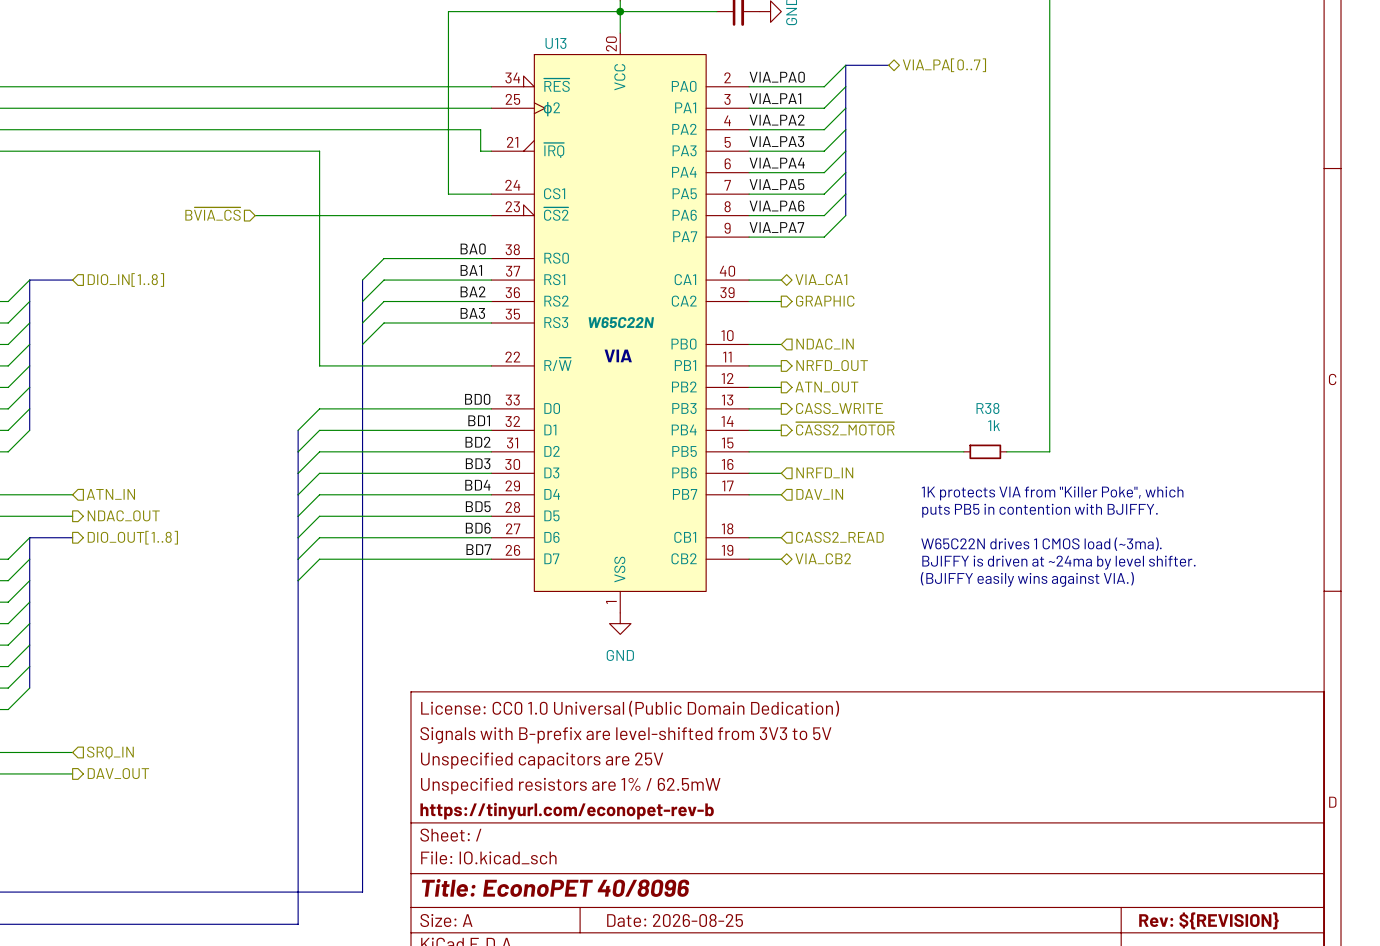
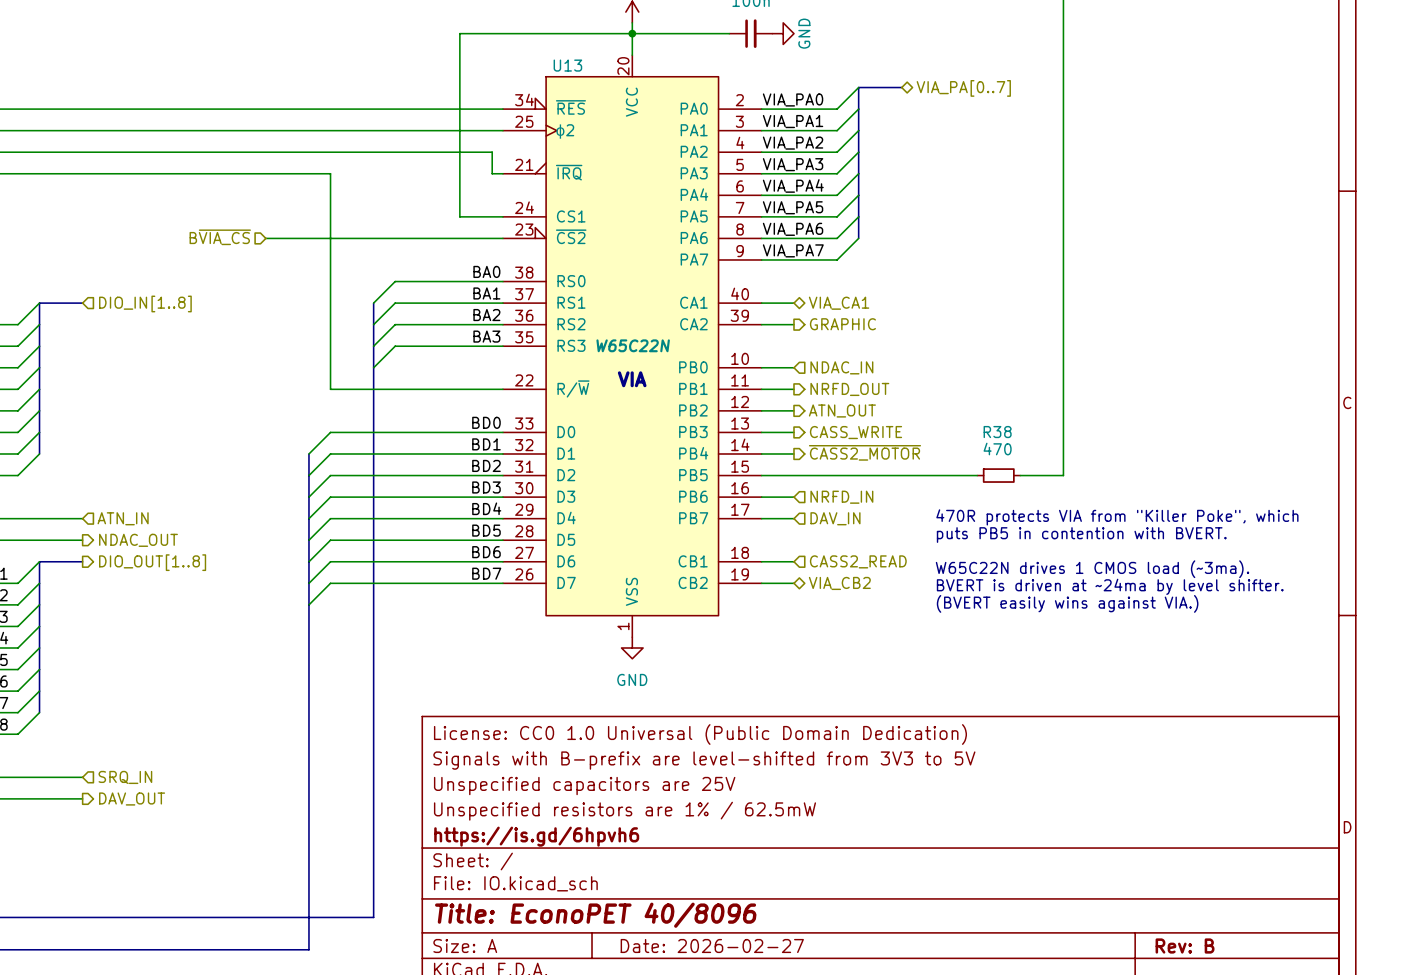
R38 value: 1k (994, 425) -> 470 (997, 449)
text: 1K protects VIA from "Killer Poke", which (1052, 493) -> 470R protects VIA from "Killer Poke", which (1117, 517)
text: puts PB5 in contention with BJIFFY. (1039, 510) -> puts PB5 in contention with BVERT. (1081, 535)
text: BJIFFY is driven at ~24ma by level shifter. (1058, 562) -> BVERT is driven at ~24ma by level shifter. (1110, 586)
text: (BJIFFY easily wins against VIA.) (1027, 579) -> (BVERT easily wins against VIA.) (1067, 603)
title block: https://tinyurl.com/econopet-rev-b (567, 811) -> https://is.gd/6hpvh6 (536, 836)
title block: Date: 2026-08-25 (675, 920) -> Date: 2026-02-27 (712, 946)
title block: Rev: ${REVISION} (1208, 920) -> Rev: B (1185, 946)

